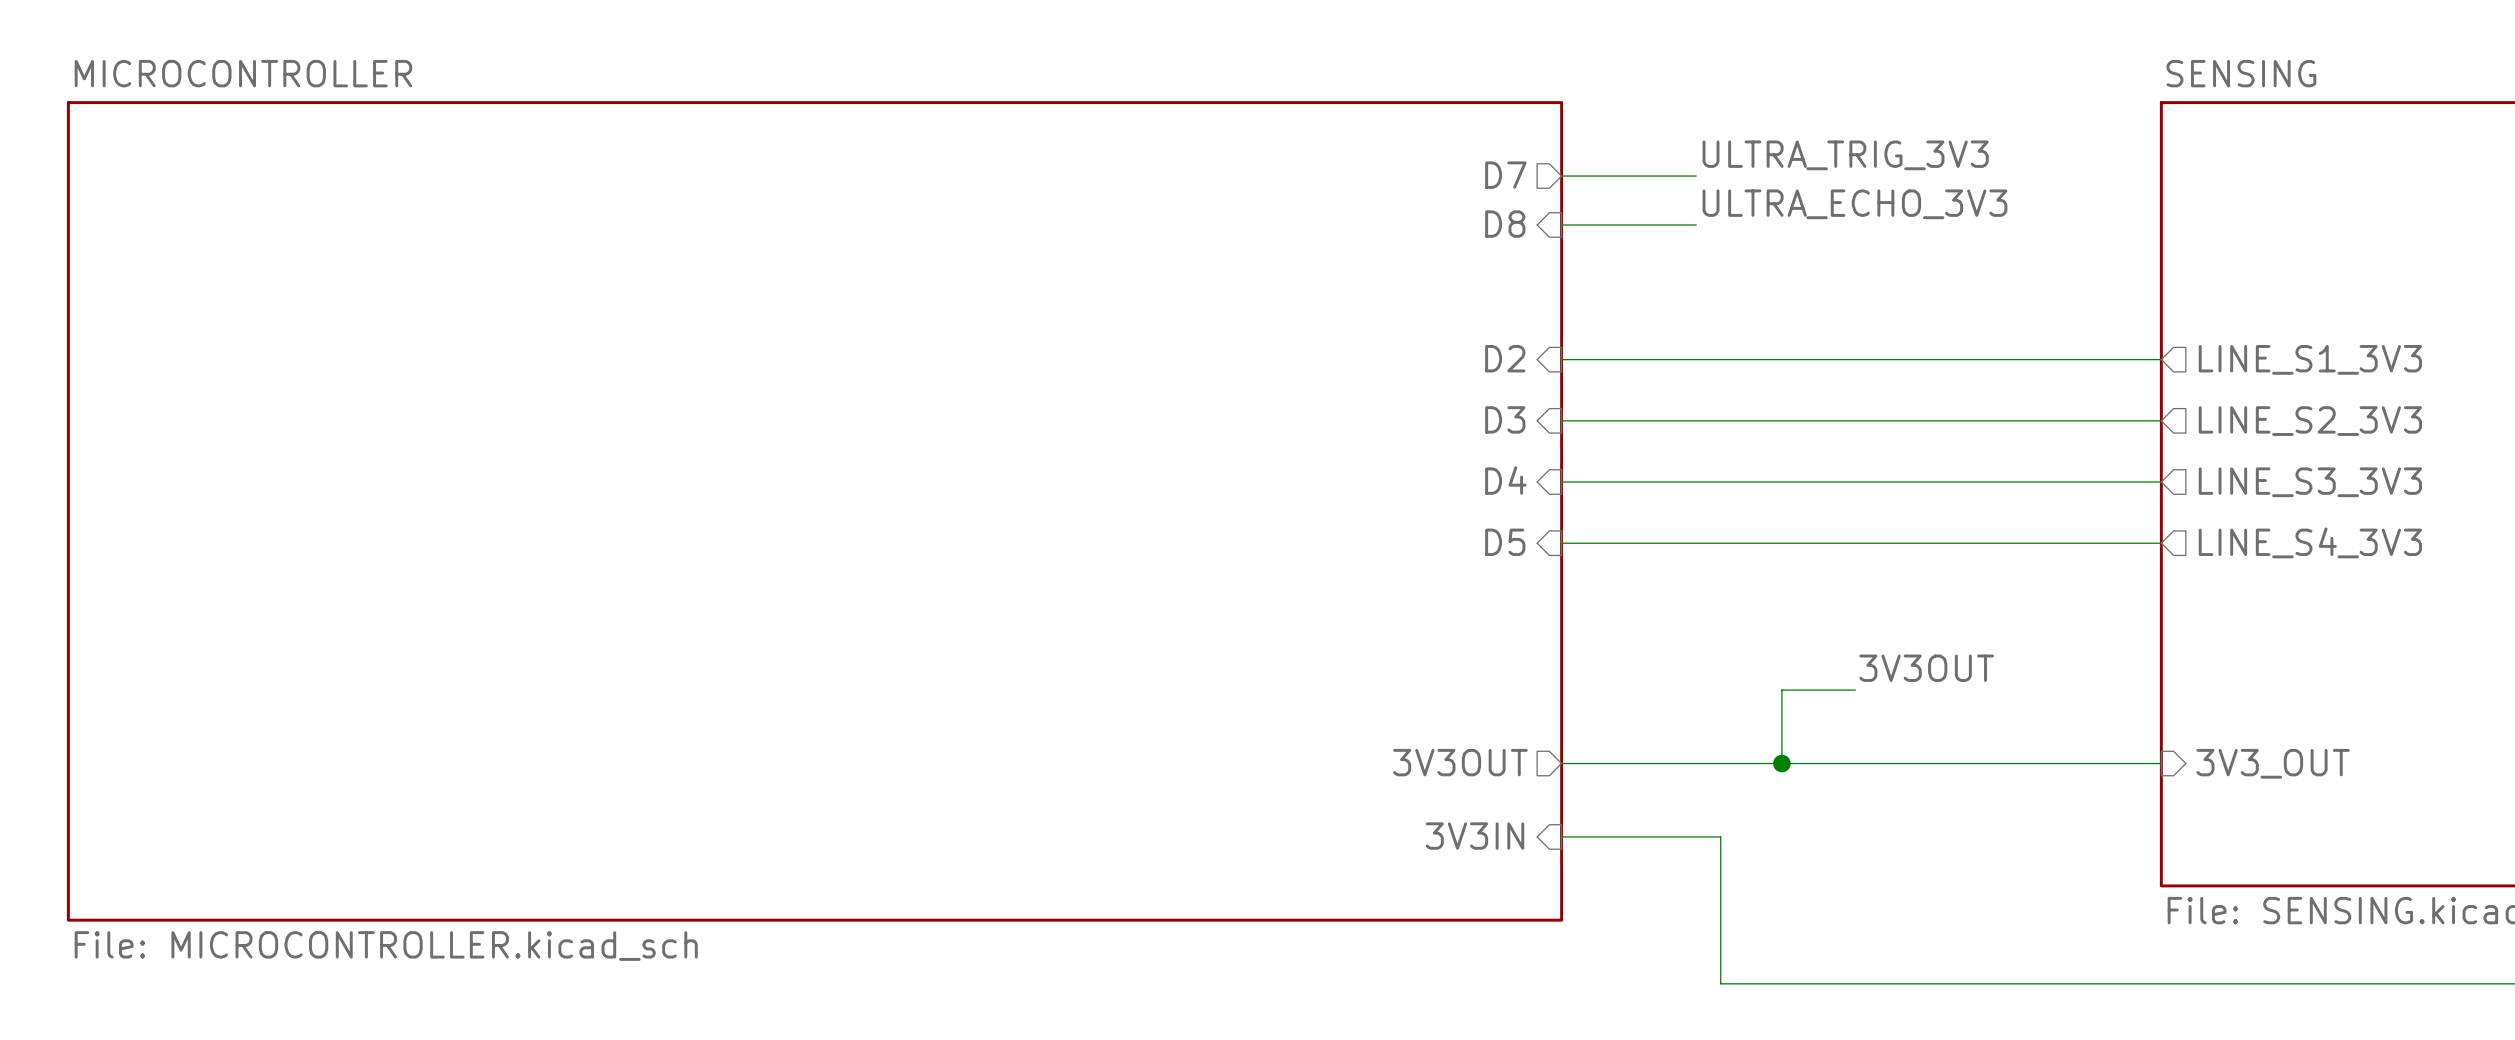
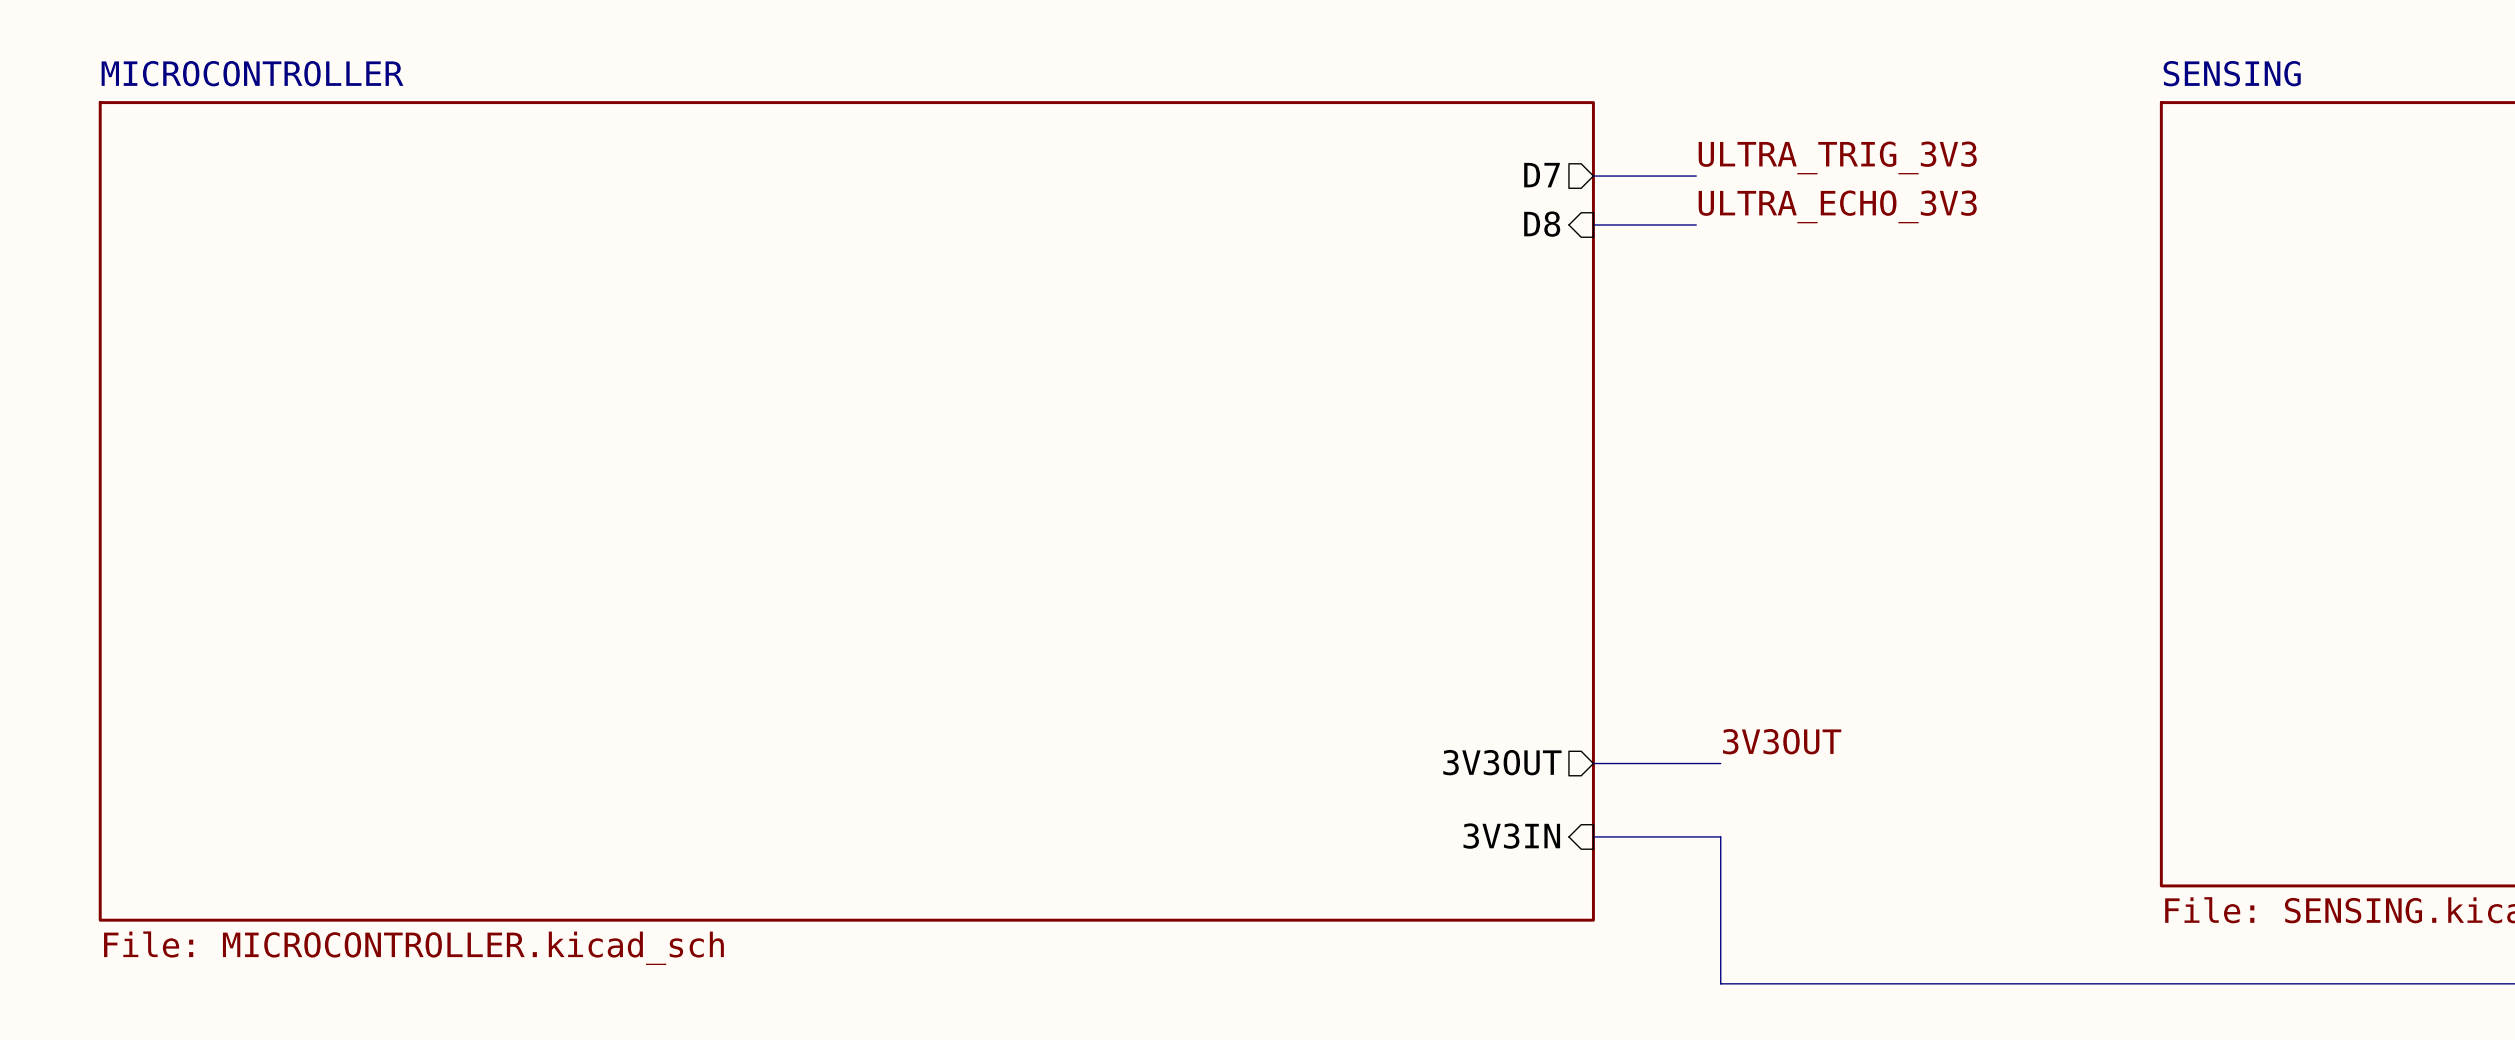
sheet pin position: D7 (1505, 175) -> D7 (1542, 175)
wire: (1561, 176) (1593, 176) -> none
sheet pin position: D8 (1505, 224) -> D8 (1542, 224)
wire: (1561, 224) (1593, 224) -> none
sheet pin: D2 (1505, 358) -> none
wire: (1561, 359) (2161, 359) -> none
sheet pin: LINE_S1_3V3 (2310, 359) -> none
sheet pin: D3 (1505, 419) -> none
wire: (1561, 420) (2161, 420) -> none
sheet pin: LINE_S2_3V3 (2310, 421) -> none
sheet pin: D4 (1505, 480) -> none
wire: (1561, 482) (2161, 482) -> none
sheet pin: LINE_S3_3V3 (2310, 482) -> none
sheet MICROCONTROLLER position: (815, 511) -> (846, 511)
sheet pin: D5 (1505, 542) -> none
sheet pin: LINE_S4_3V3 (2310, 542) -> none
wire: (1561, 543) (2161, 543) -> none
label position: 3V3OUT (1926, 668) -> 3V3OUT (1782, 741)
wire: (1855, 690) (1781, 690) (1781, 763) -> none
sheet pin position: 3V3OUT (1460, 762) -> 3V3OUT (1502, 762)
wire: (1561, 763) (1593, 763) -> none
wire: (1720, 763) (2161, 763) -> none
junction: (1781, 763) -> none
sheet pin: 3V3_OUT (2273, 763) -> none
sheet pin position: 3V3IN (1474, 836) -> 3V3IN (1511, 836)
wire: (1561, 836) (1593, 836) -> none

